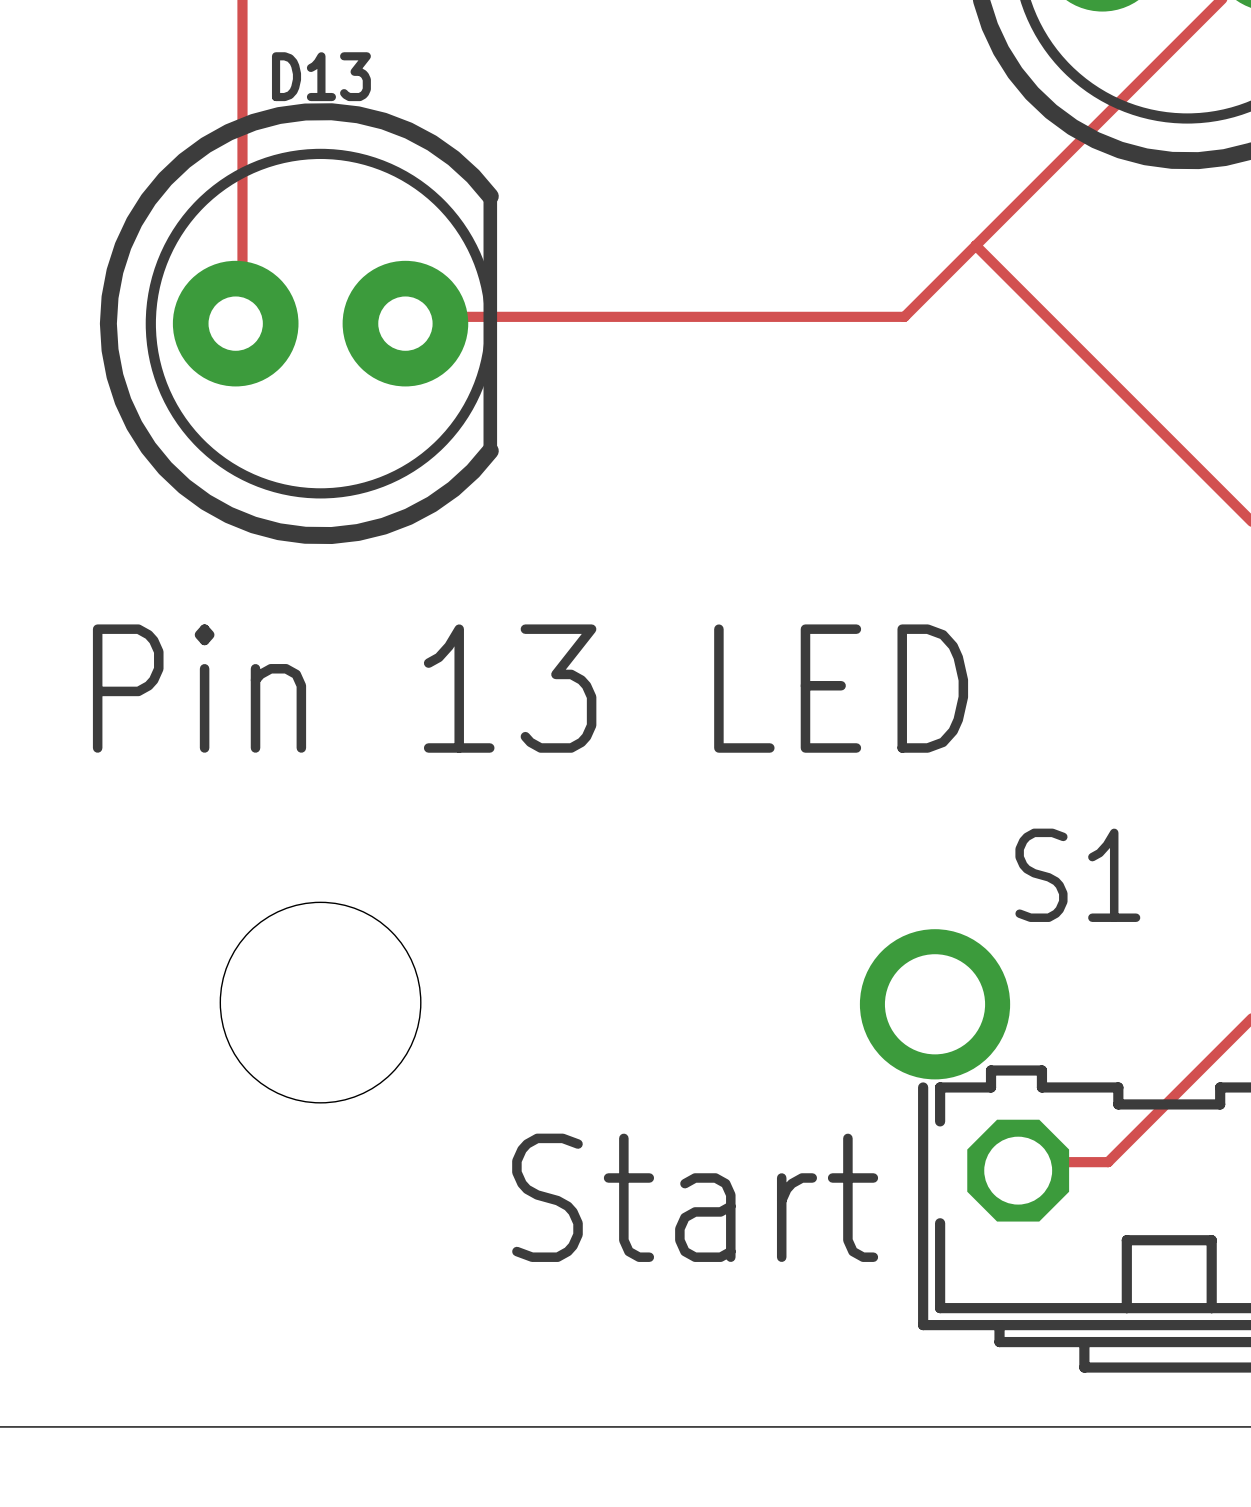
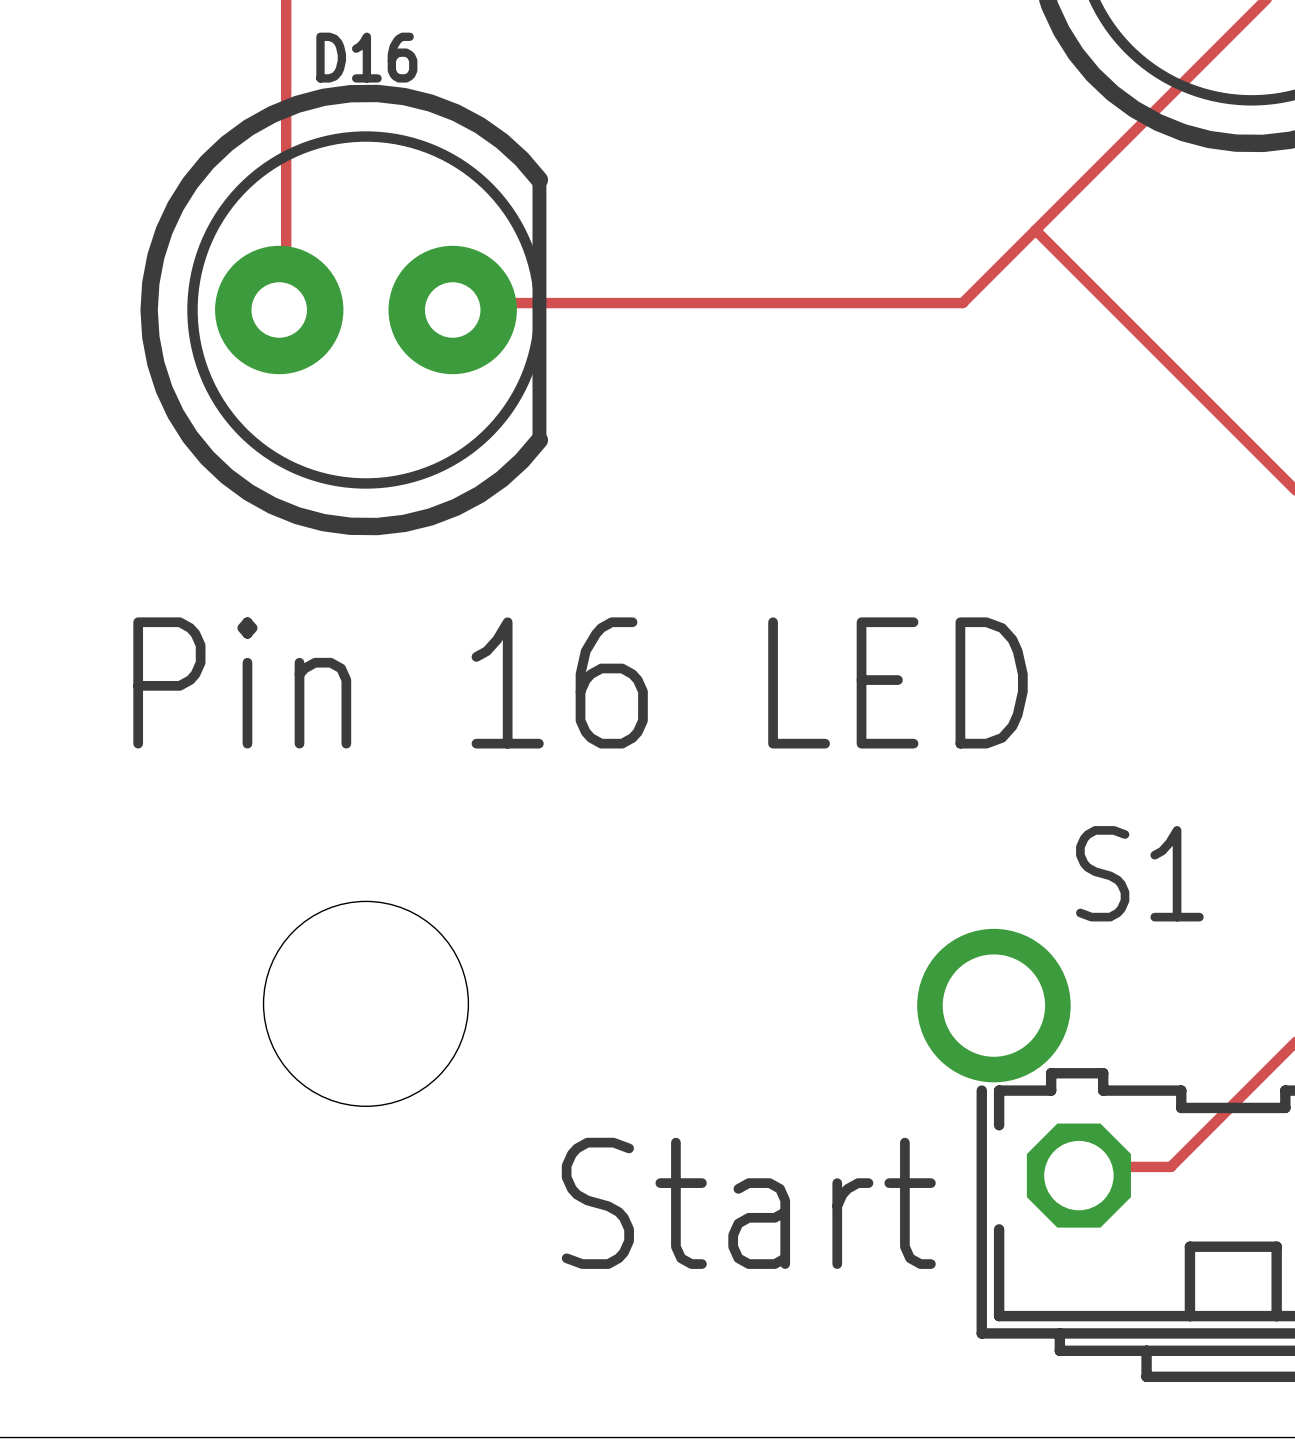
D13 name: D13 (321, 76) -> D16 (366, 57)
text: Pin 13 LED (530, 688) -> Pin 16 LED (580, 682)

